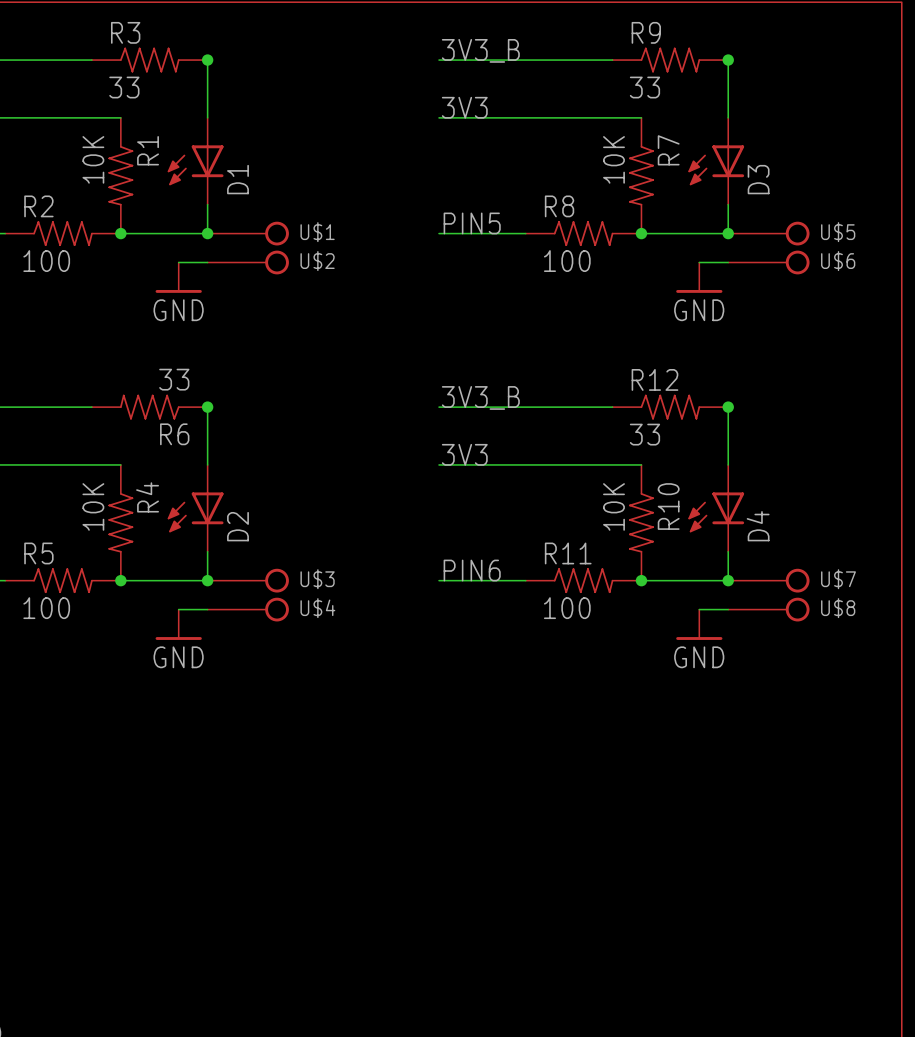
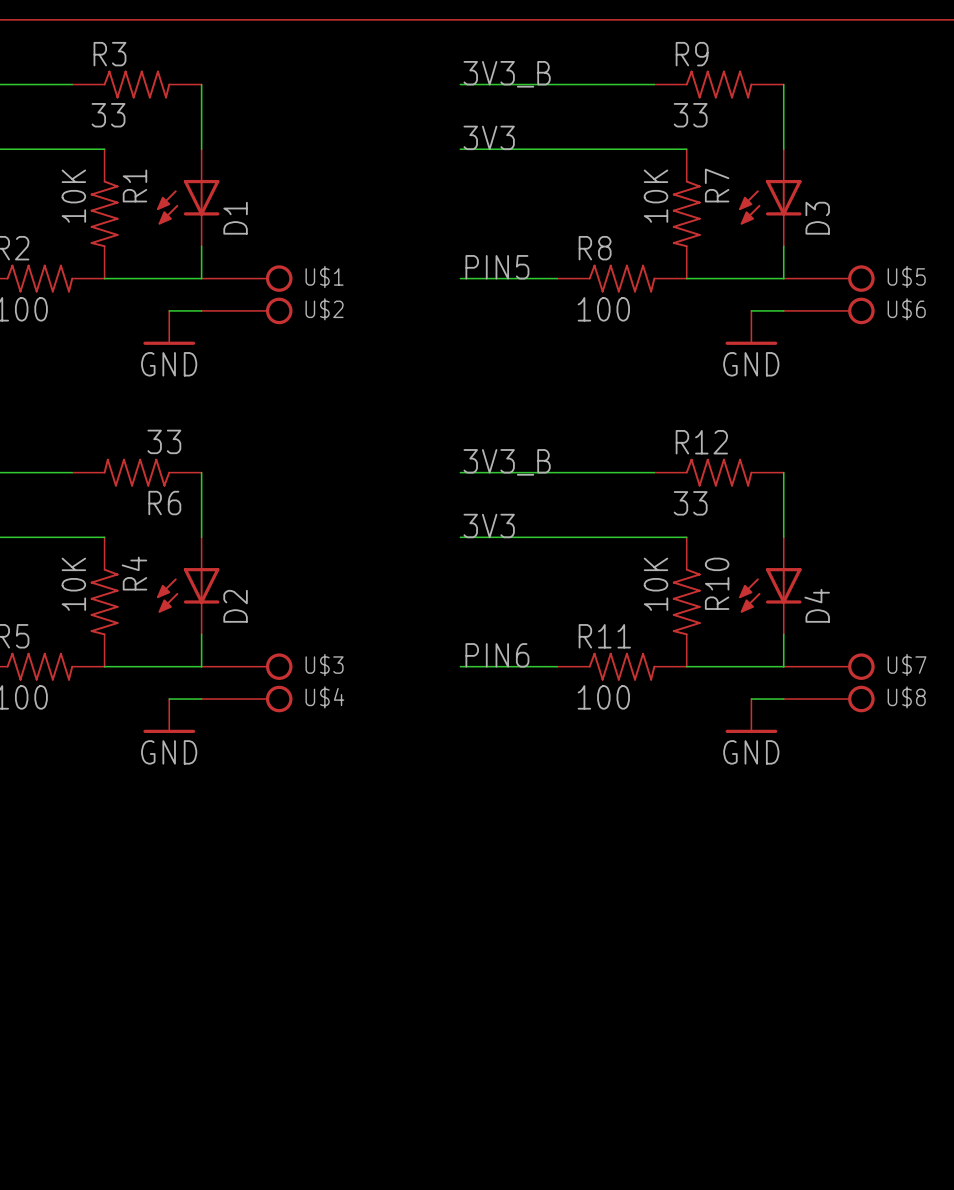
junction: (207, 60) -> none
junction: (728, 60) -> none
junction: (120, 233) -> none
junction: (207, 233) -> none
junction: (641, 233) -> none
junction: (728, 233) -> none
junction: (207, 407) -> none
junction: (728, 407) -> none
junction: (120, 580) -> none
junction: (207, 580) -> none
junction: (641, 580) -> none
junction: (728, 580) -> none

